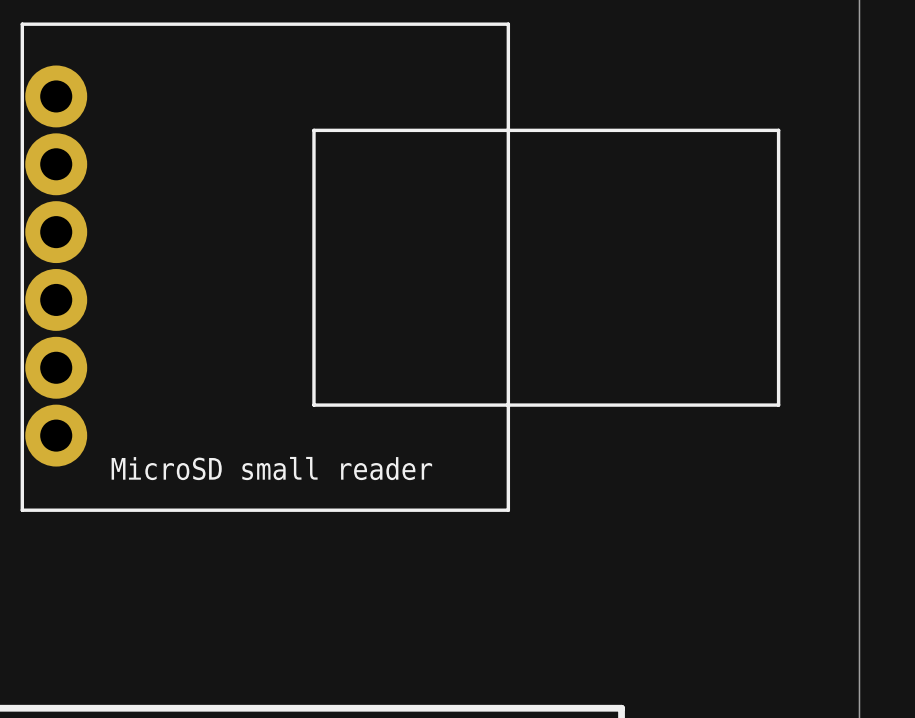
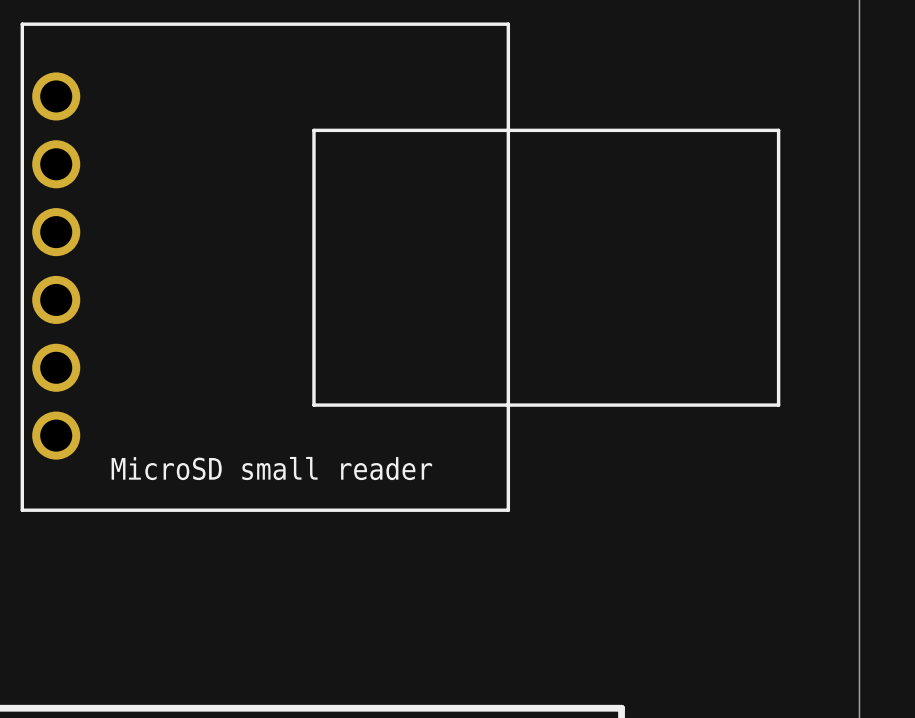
part footprint: [20, 22, 781, 512] -> [20, 22, 781, 512]

